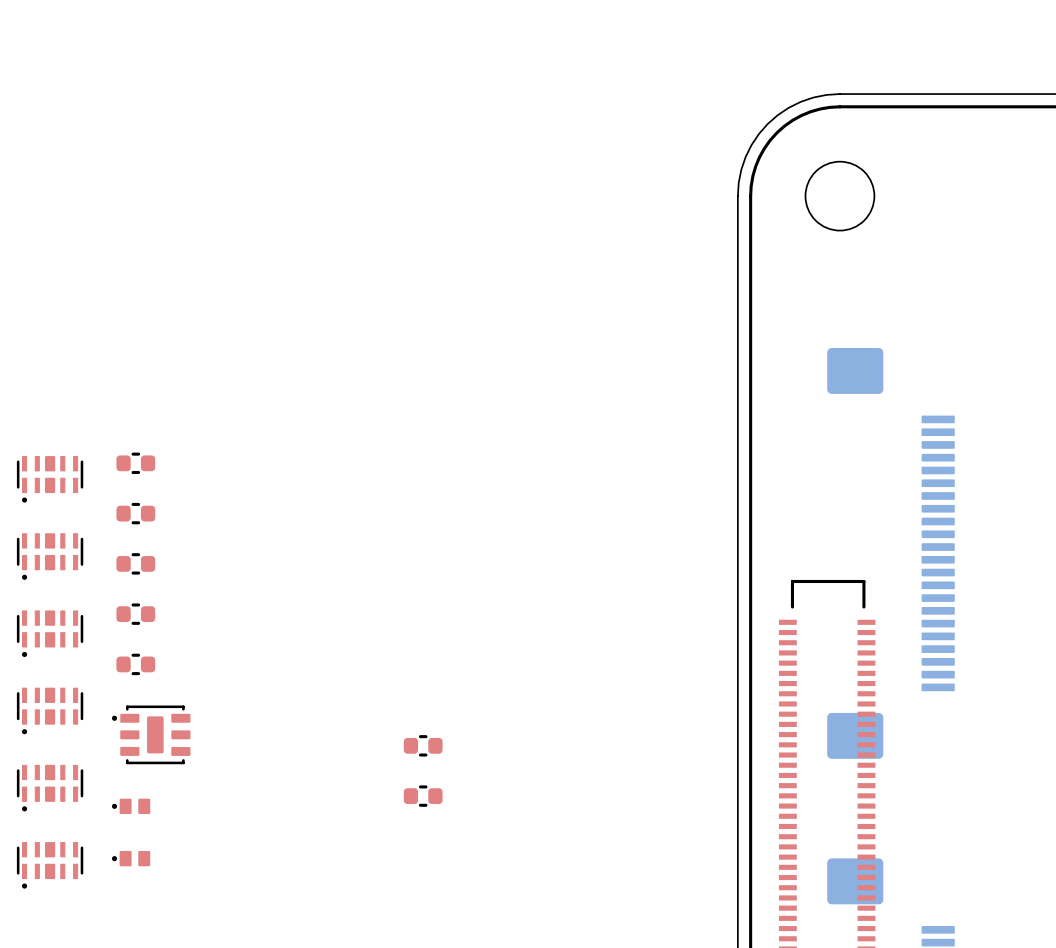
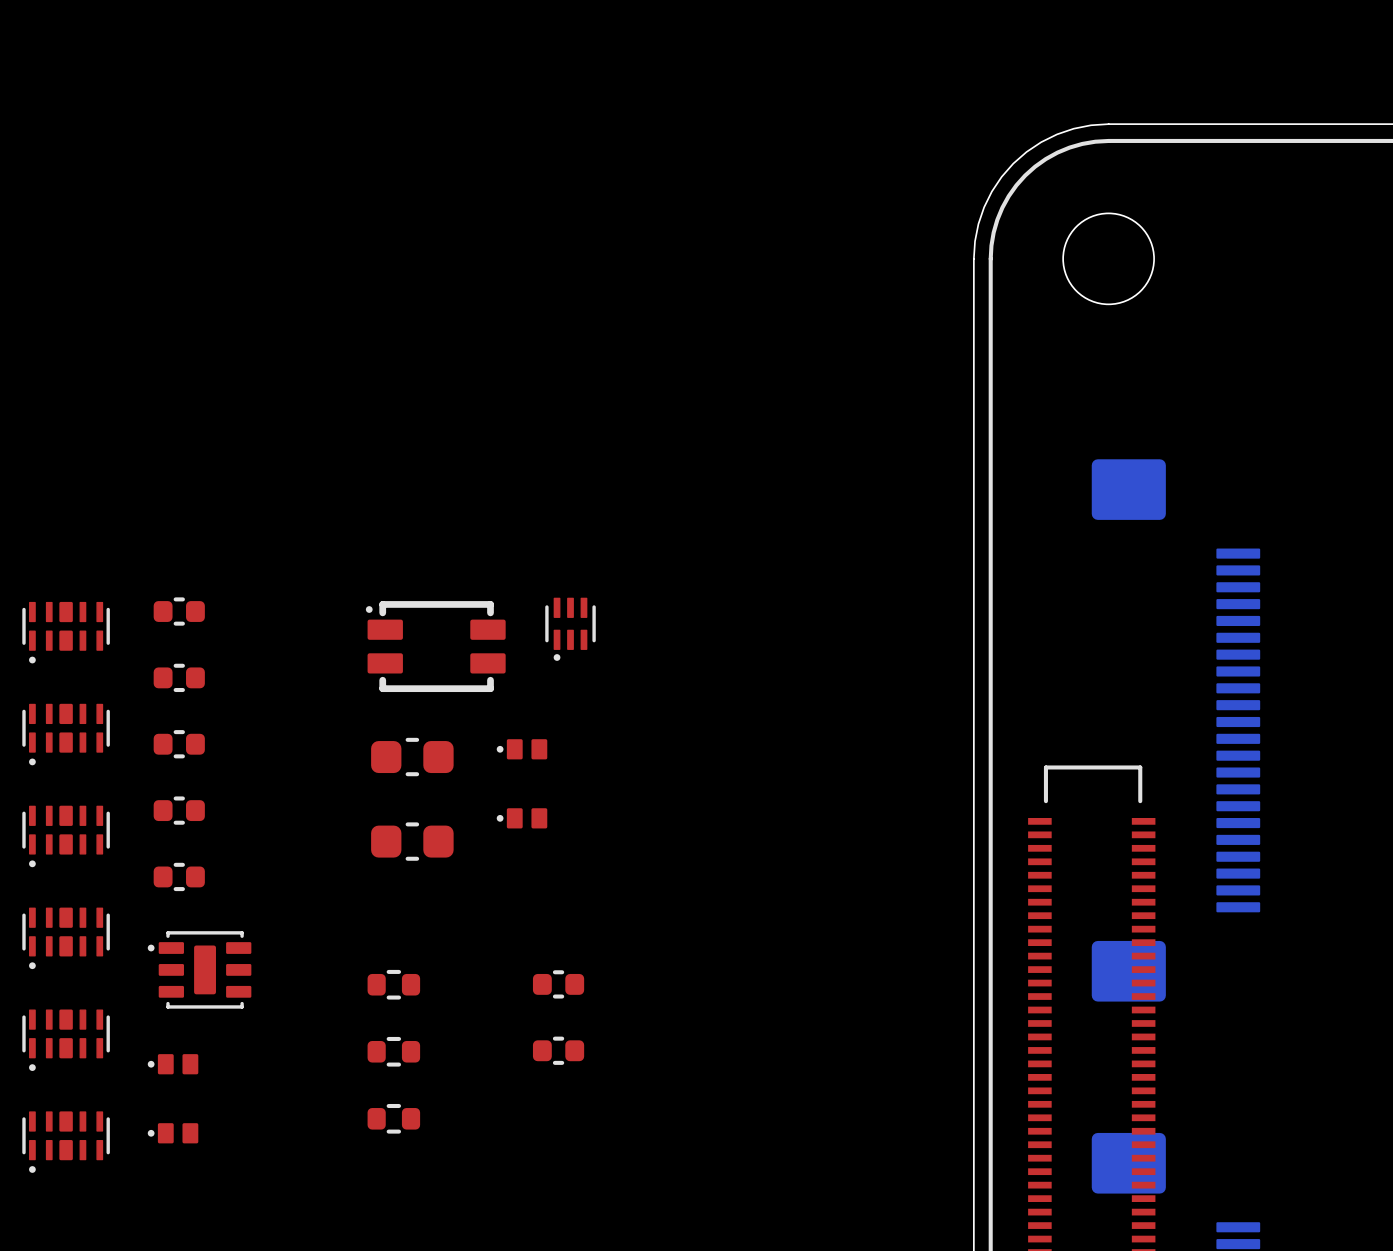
part: none -> (570, 629)
part: none -> (435, 646)
part: none -> (522, 749)
part: none -> (412, 757)
part: none -> (522, 818)
part: none -> (412, 841)
part: none -> (393, 984)
part: none -> (393, 1051)
part: none -> (393, 1118)

